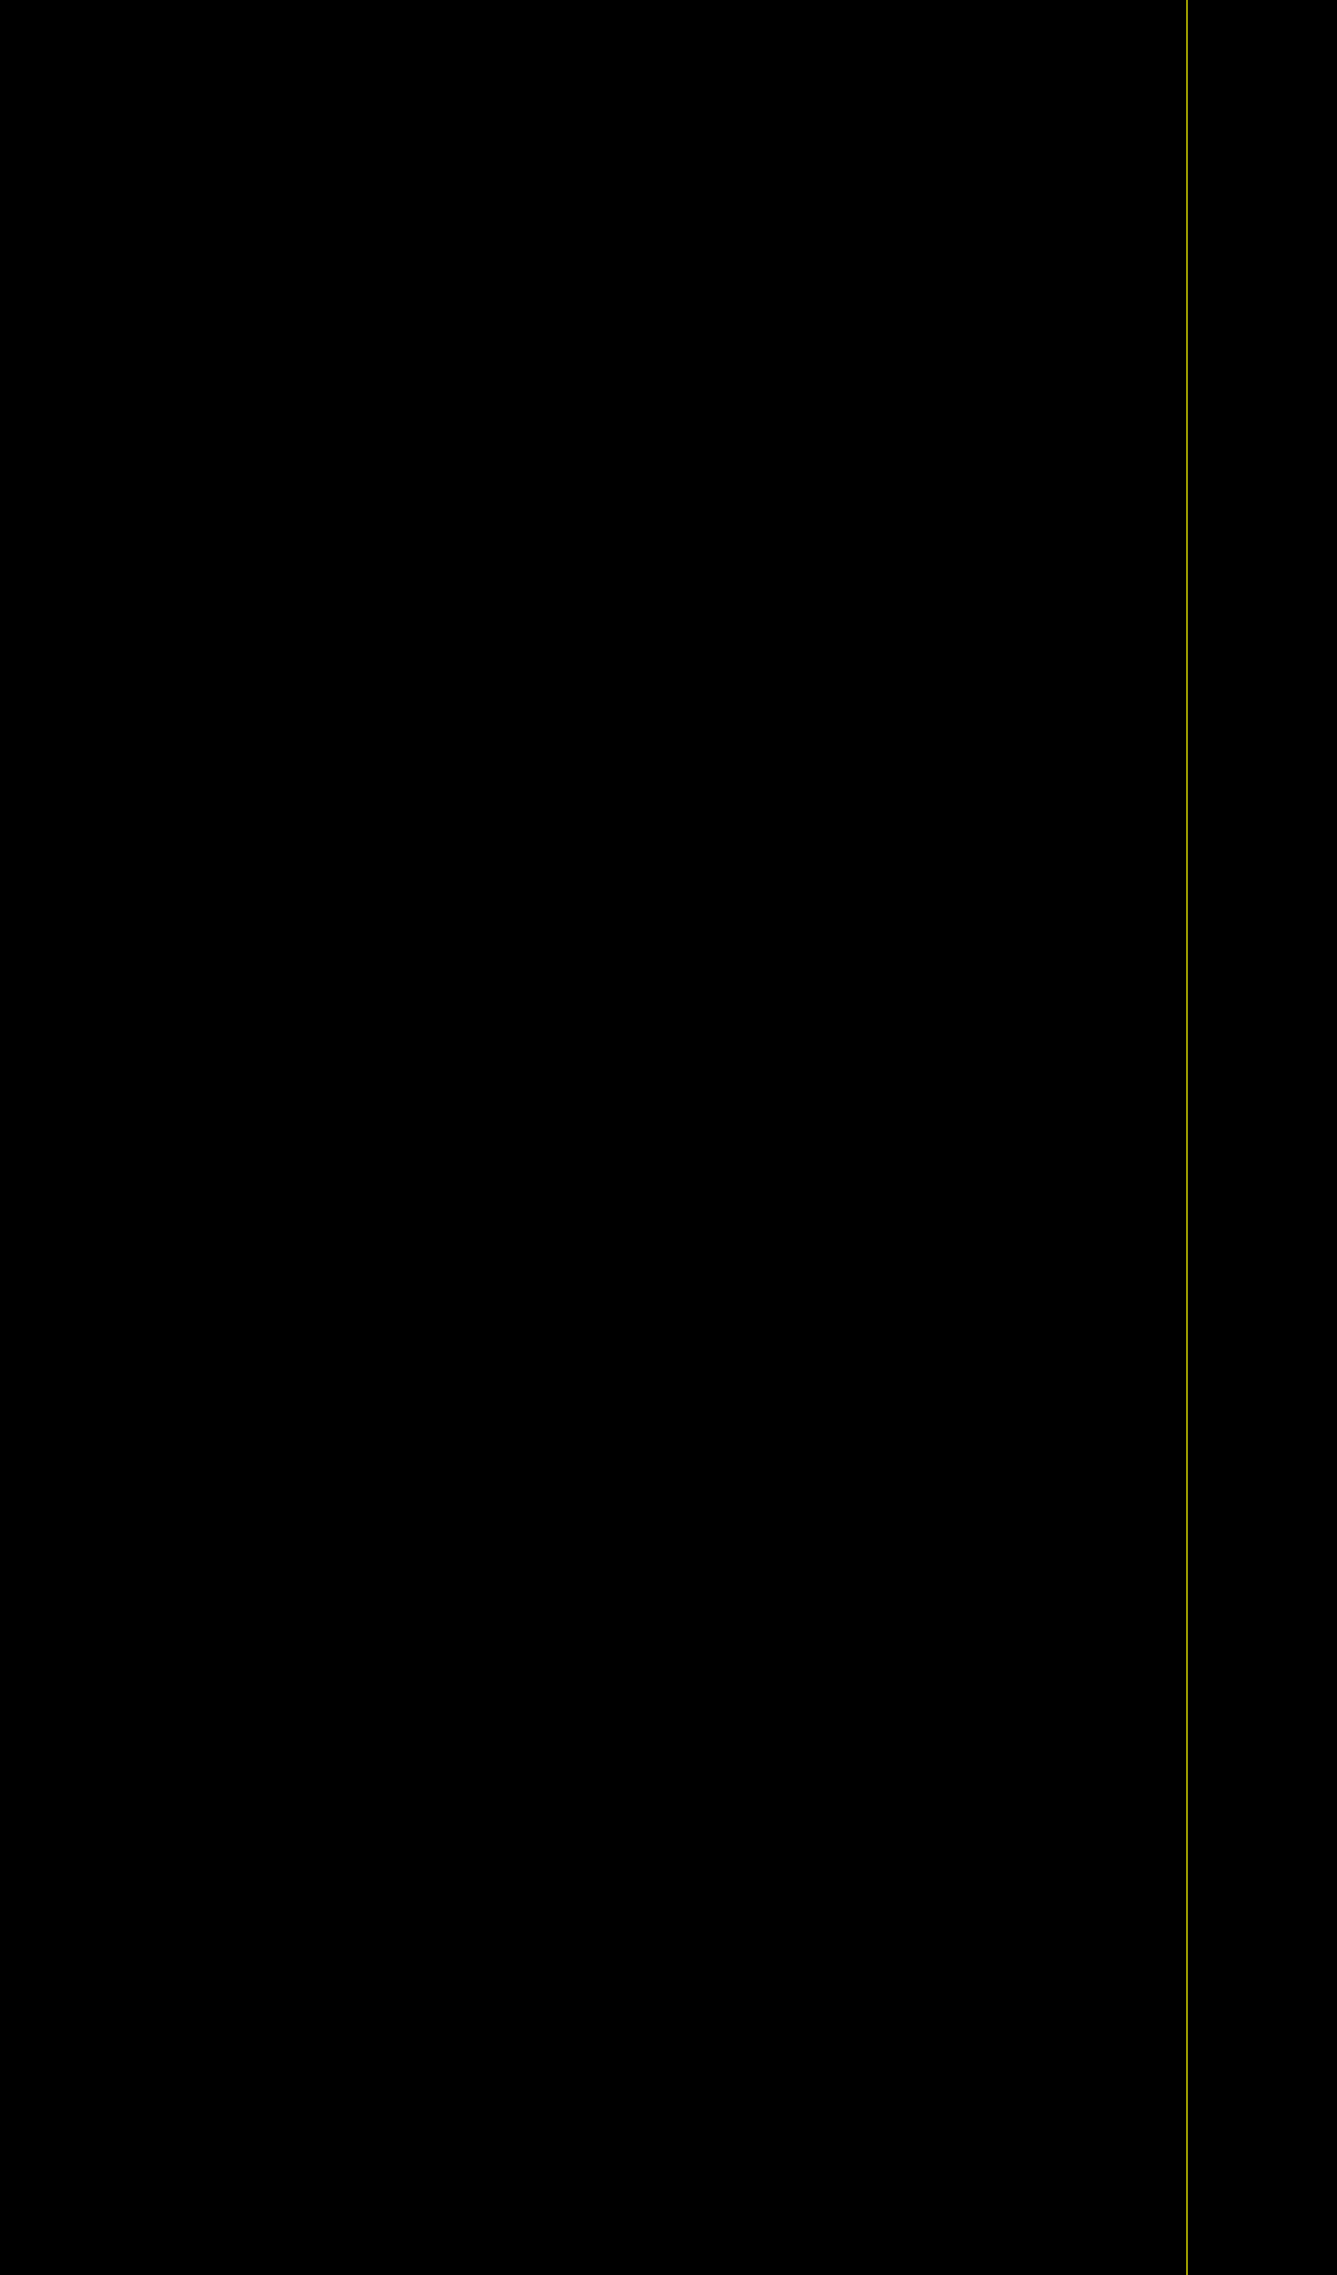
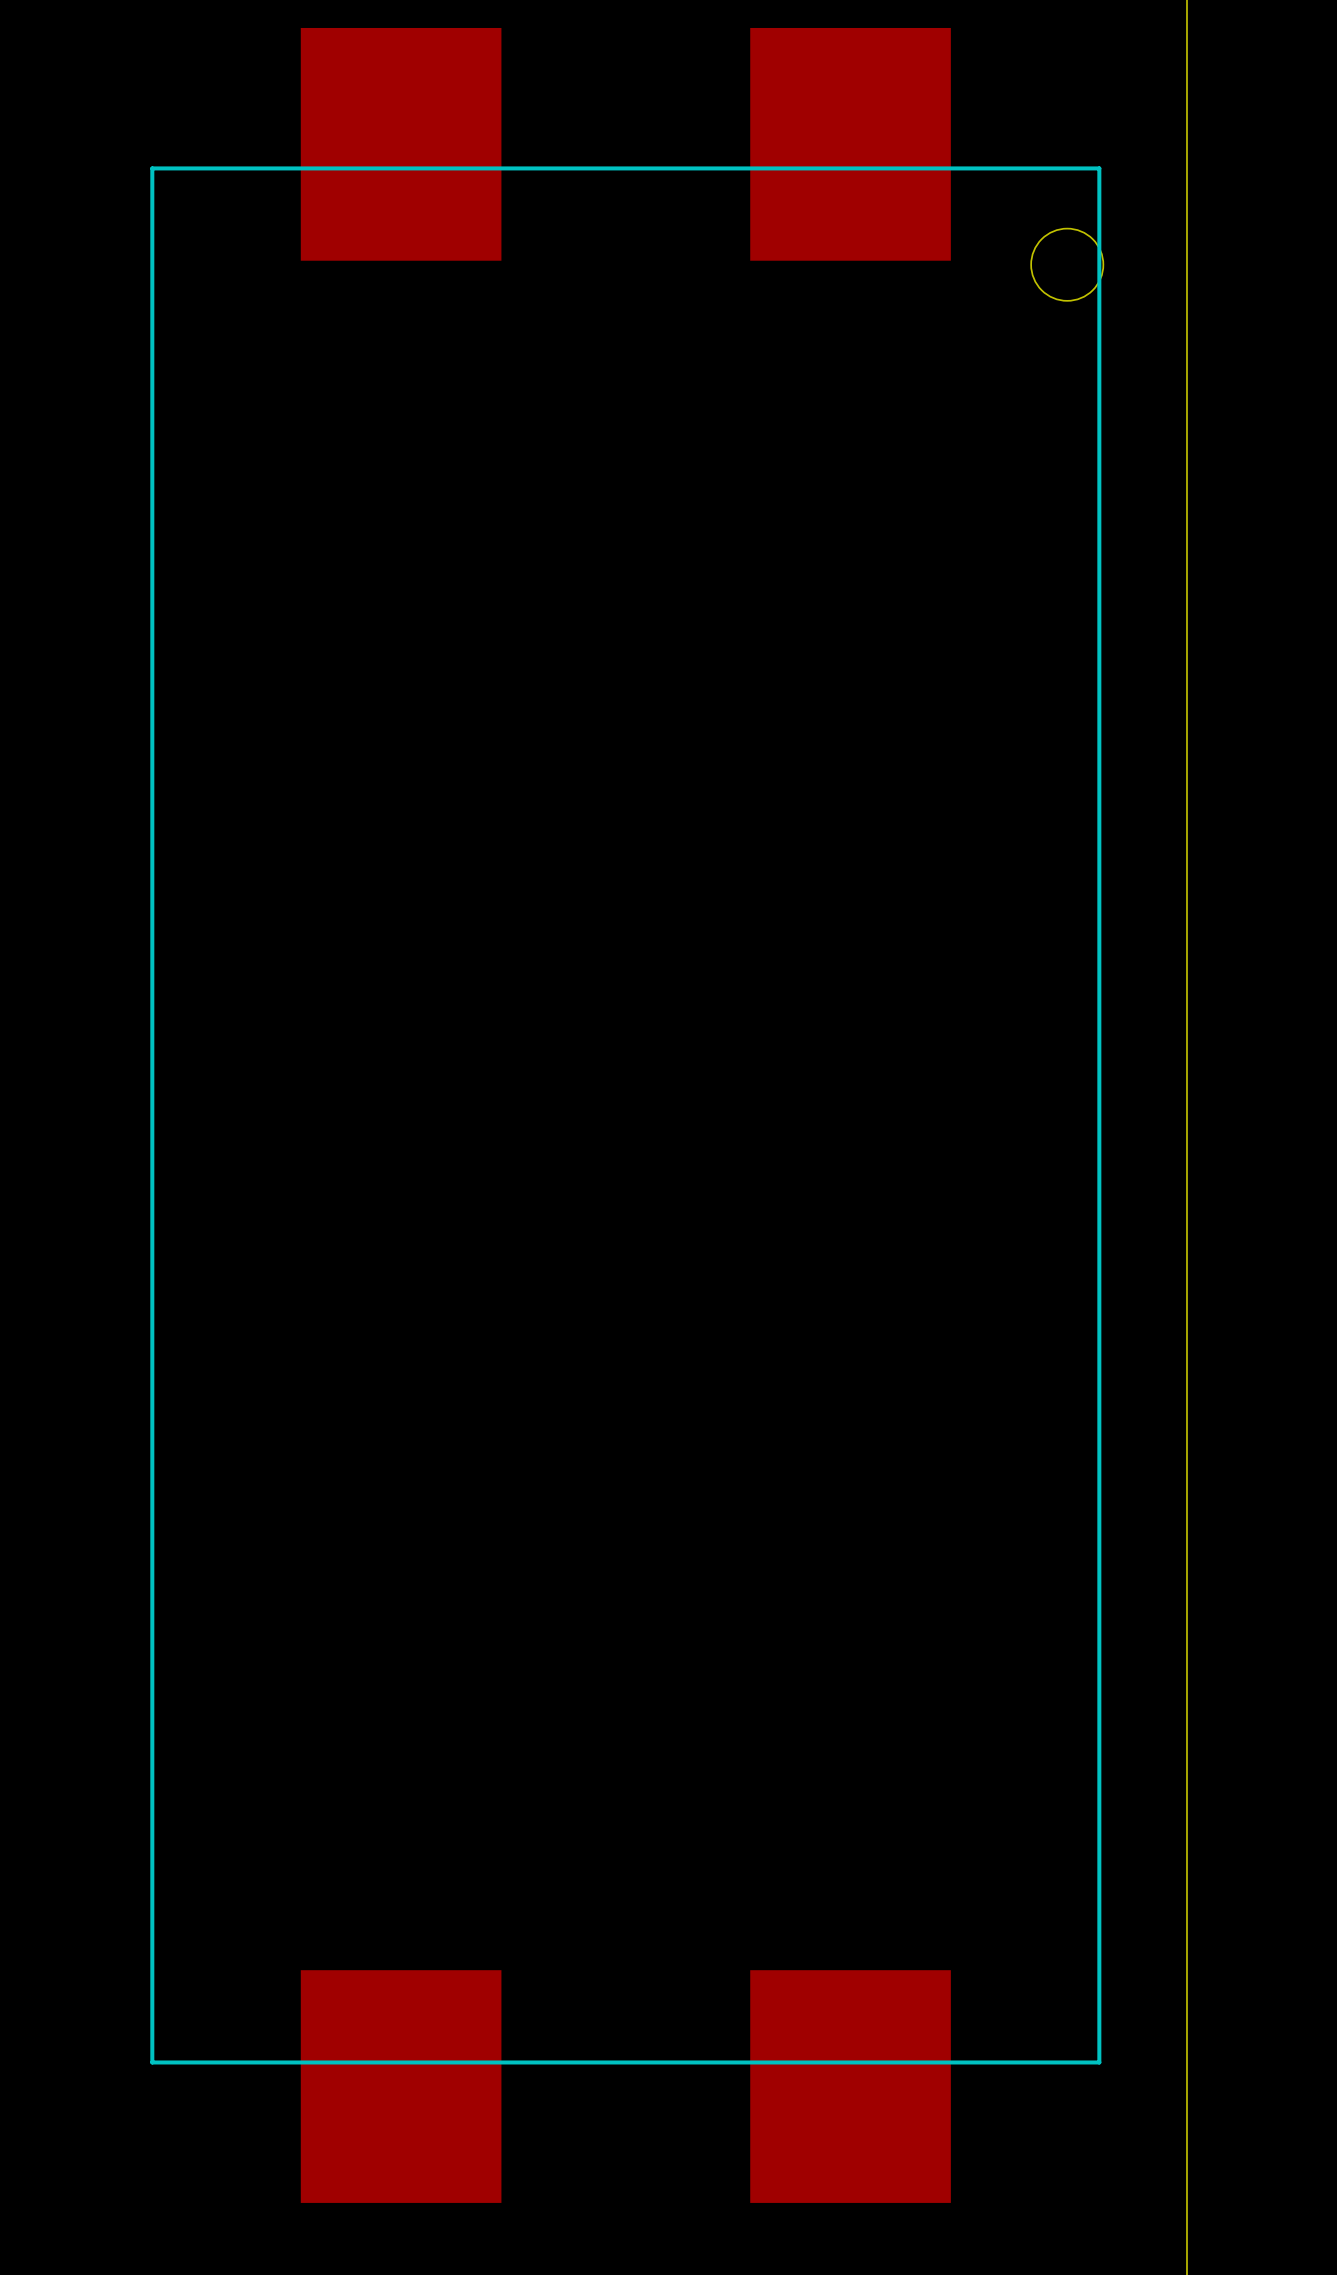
part: none -> (626, 1115)

